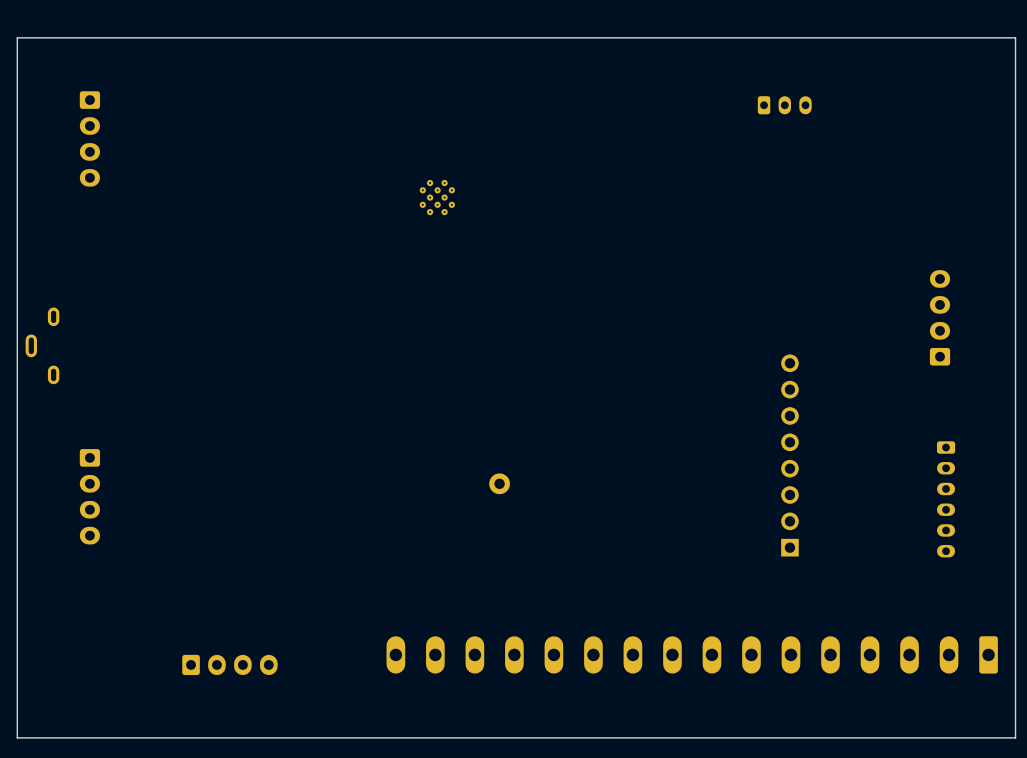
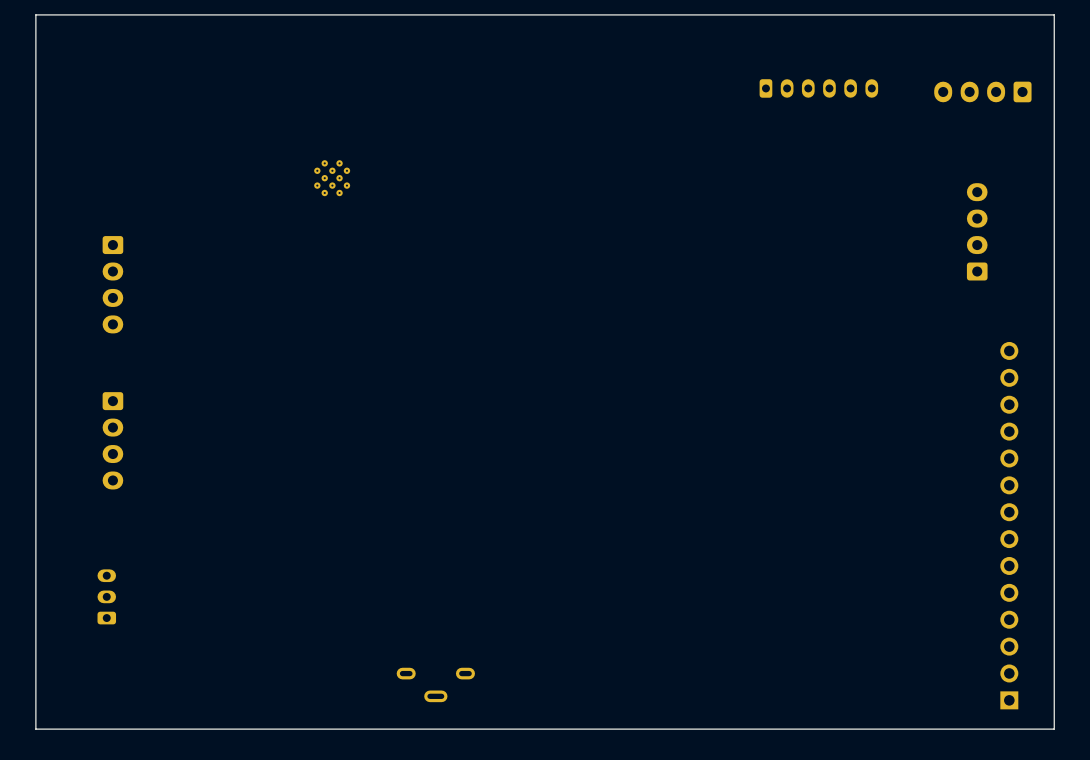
part footprint: [757, 96, 812, 115] -> [759, 79, 879, 98]
part: none -> (982, 91)
part: (89, 138) -> none
part position: (437, 197) -> (332, 178)
part: none -> (112, 284)
part position: (940, 317) -> (977, 231)
part: (42, 345) -> none
part: (789, 455) -> none
part: (499, 483) -> none
part position: (89, 496) -> (112, 440)
part: (946, 499) -> none
part: none -> (1009, 525)
part: none -> (106, 596)
part: (692, 654) -> none
part: (229, 664) -> none
part: none -> (435, 684)

